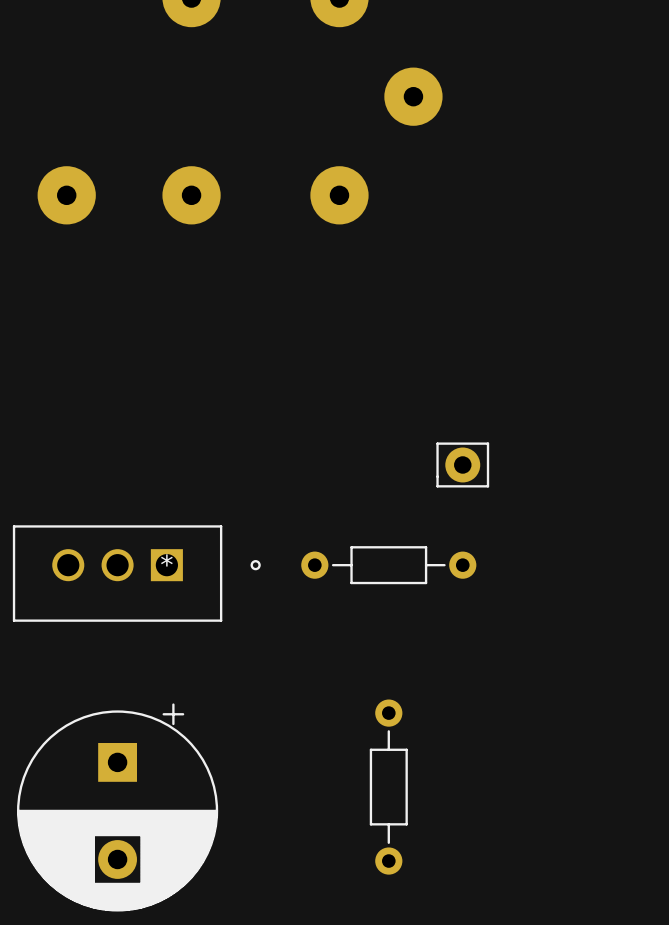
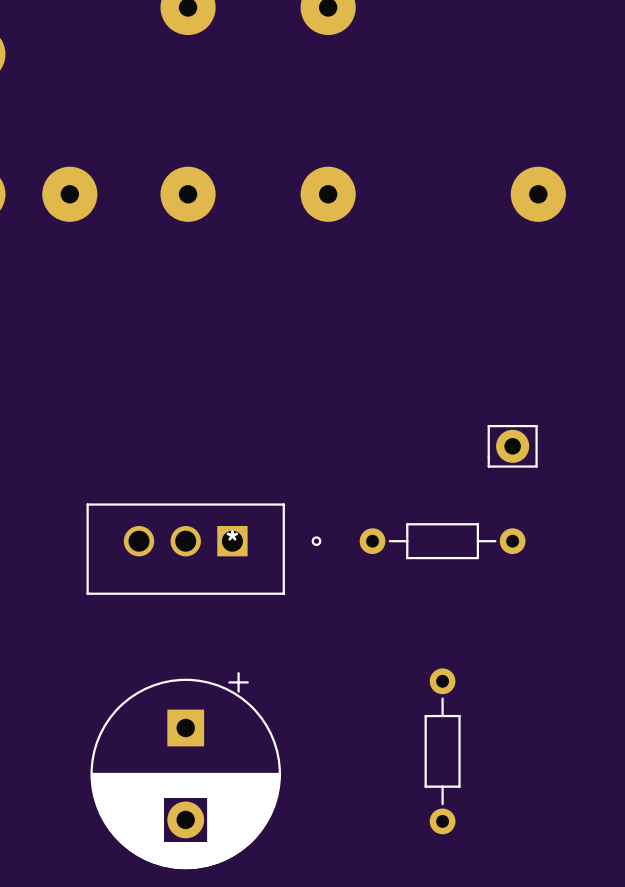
part position: (413, 96) -> (538, 194)
part position: (462, 464) -> (512, 446)
part position: (388, 565) -> (442, 541)
part position: (136, 573) -> (203, 549)
part position: (388, 787) -> (442, 751)
part position: (117, 807) -> (185, 770)

